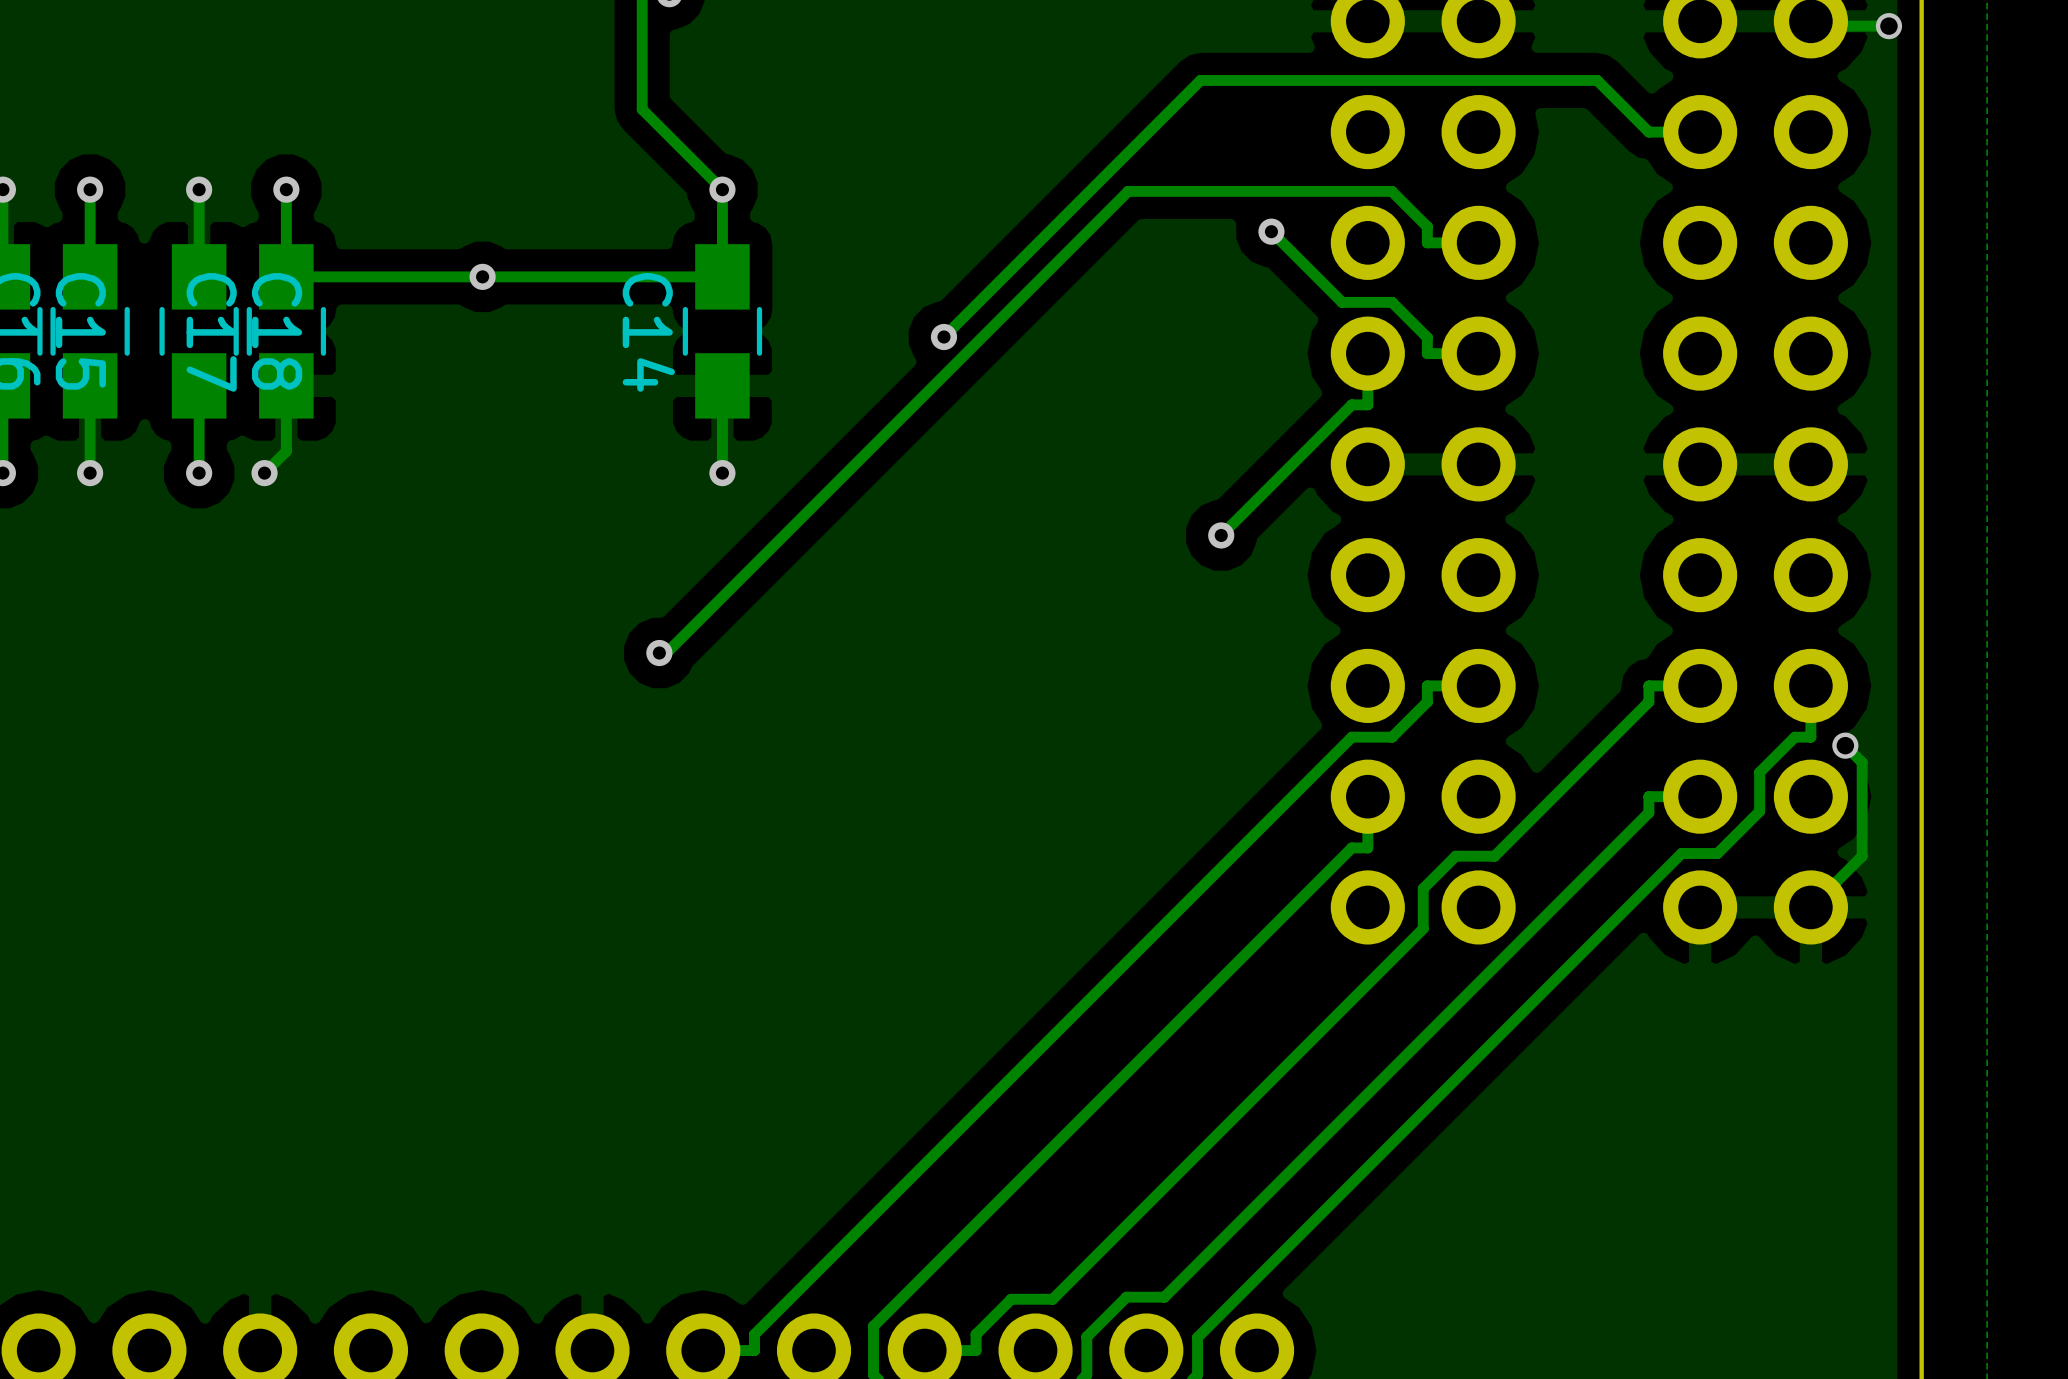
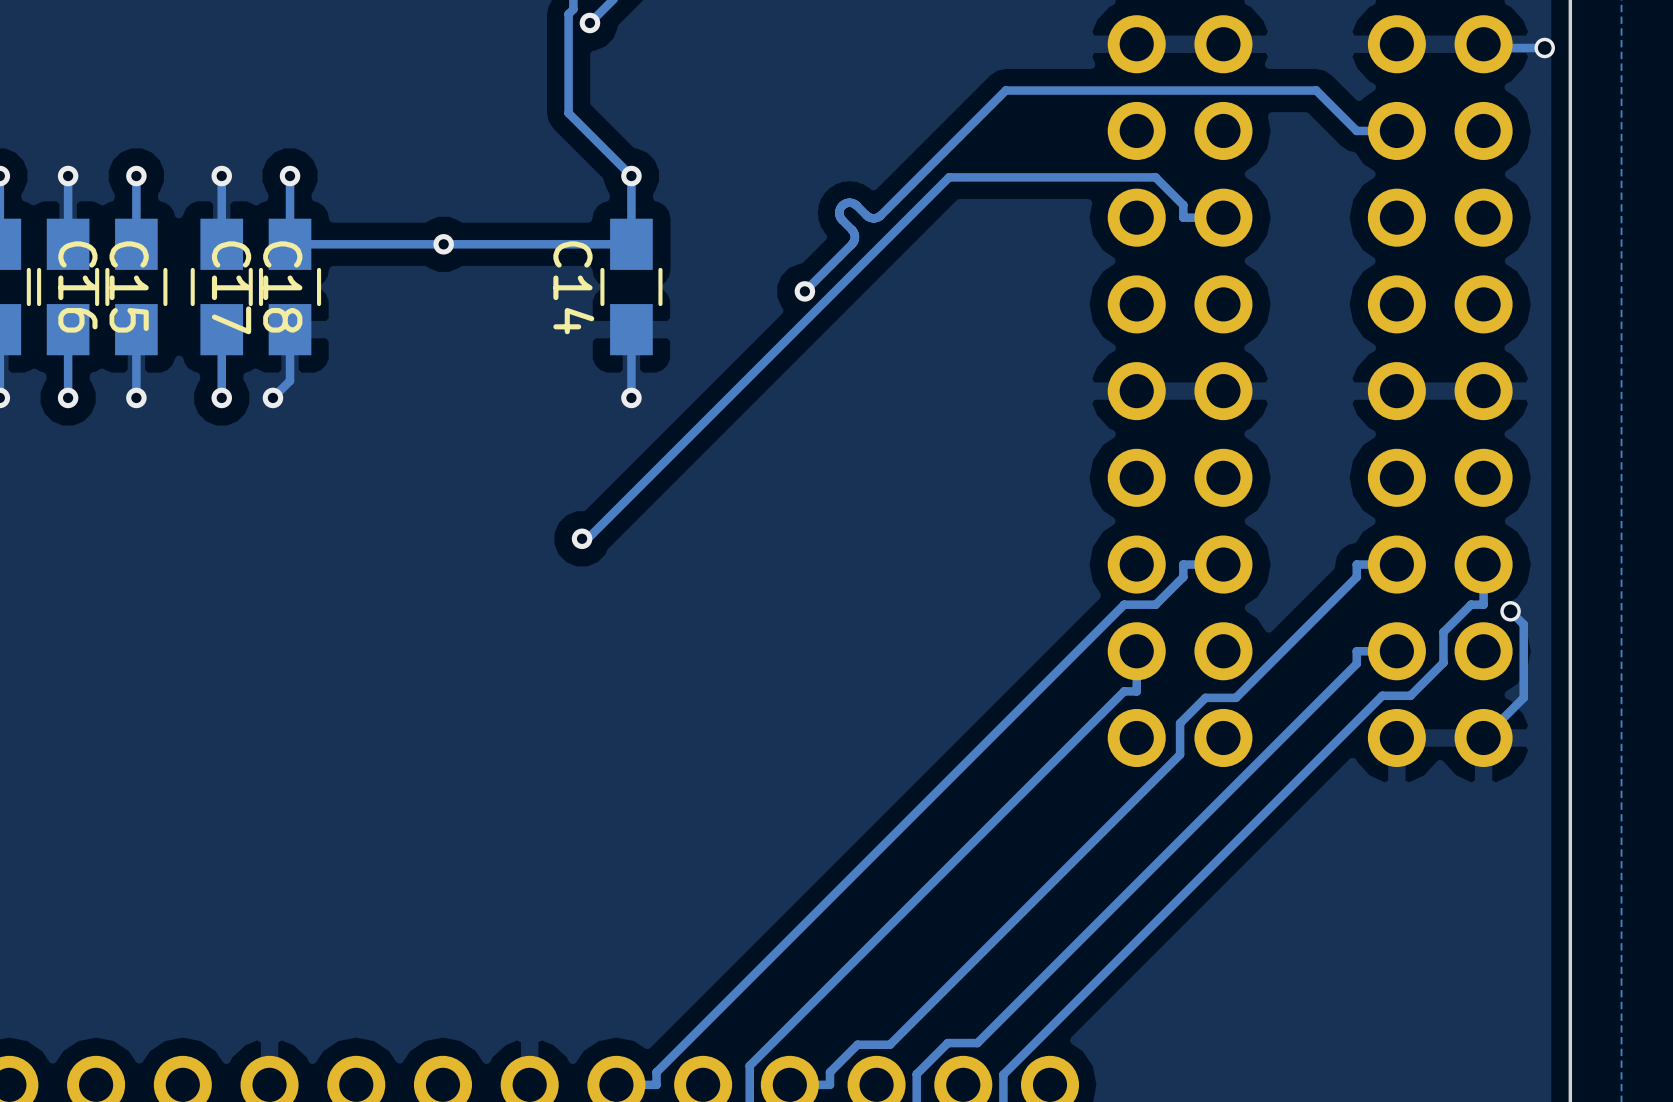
track: (1271, 231) (1342, 302) (1392, 302) (1427, 337) (1427, 353) (1478, 353) -> none
via: (1271, 231) -> none
track: (1041, 239) (1004, 276) -> (880, 215) (874, 218) (870, 217) (852, 203) (848, 202) (842, 205) (839, 211) (839, 216) (854, 233) (854, 238) (851, 244)
track: (1367, 353) (1367, 404) (1351, 404) (1221, 535) -> none
via: (1221, 535) -> none

